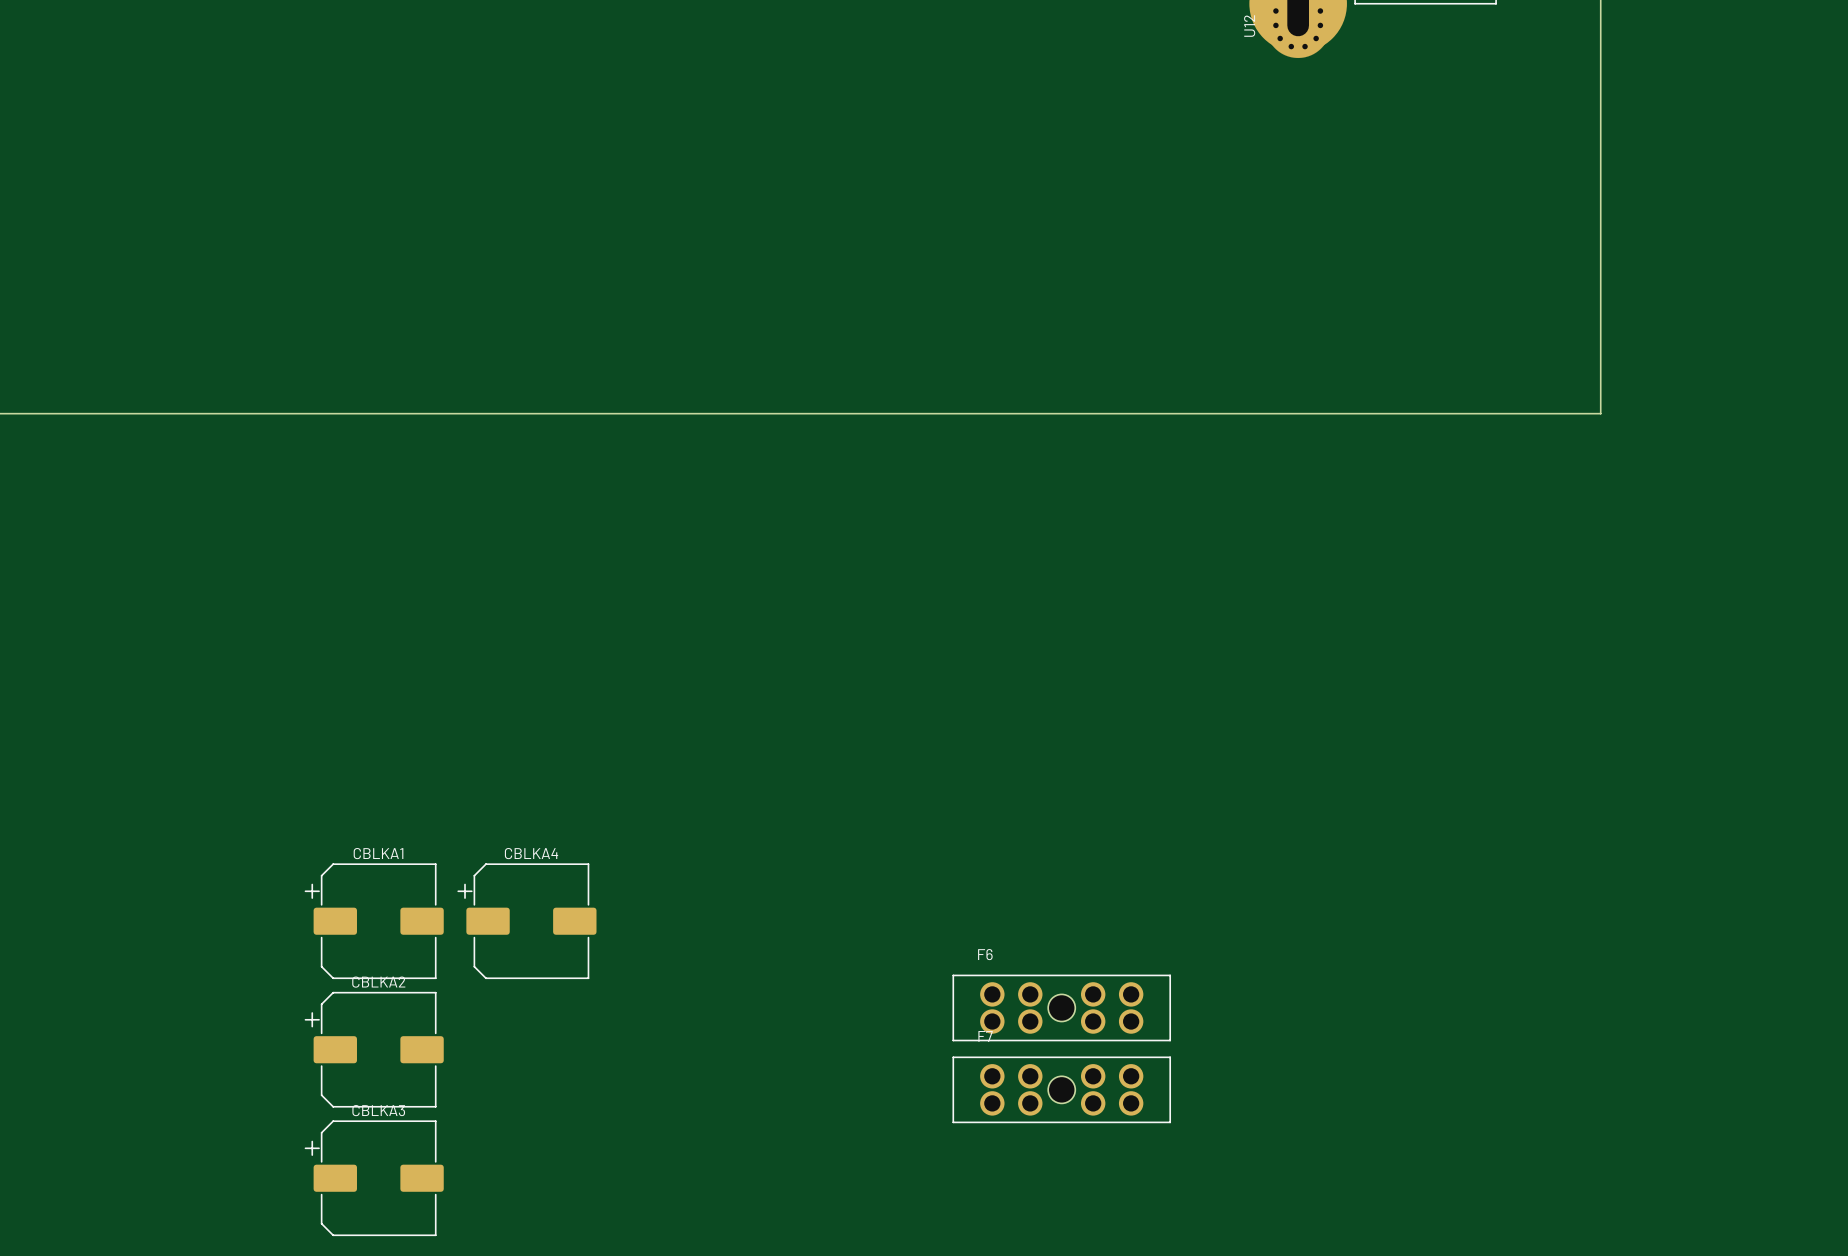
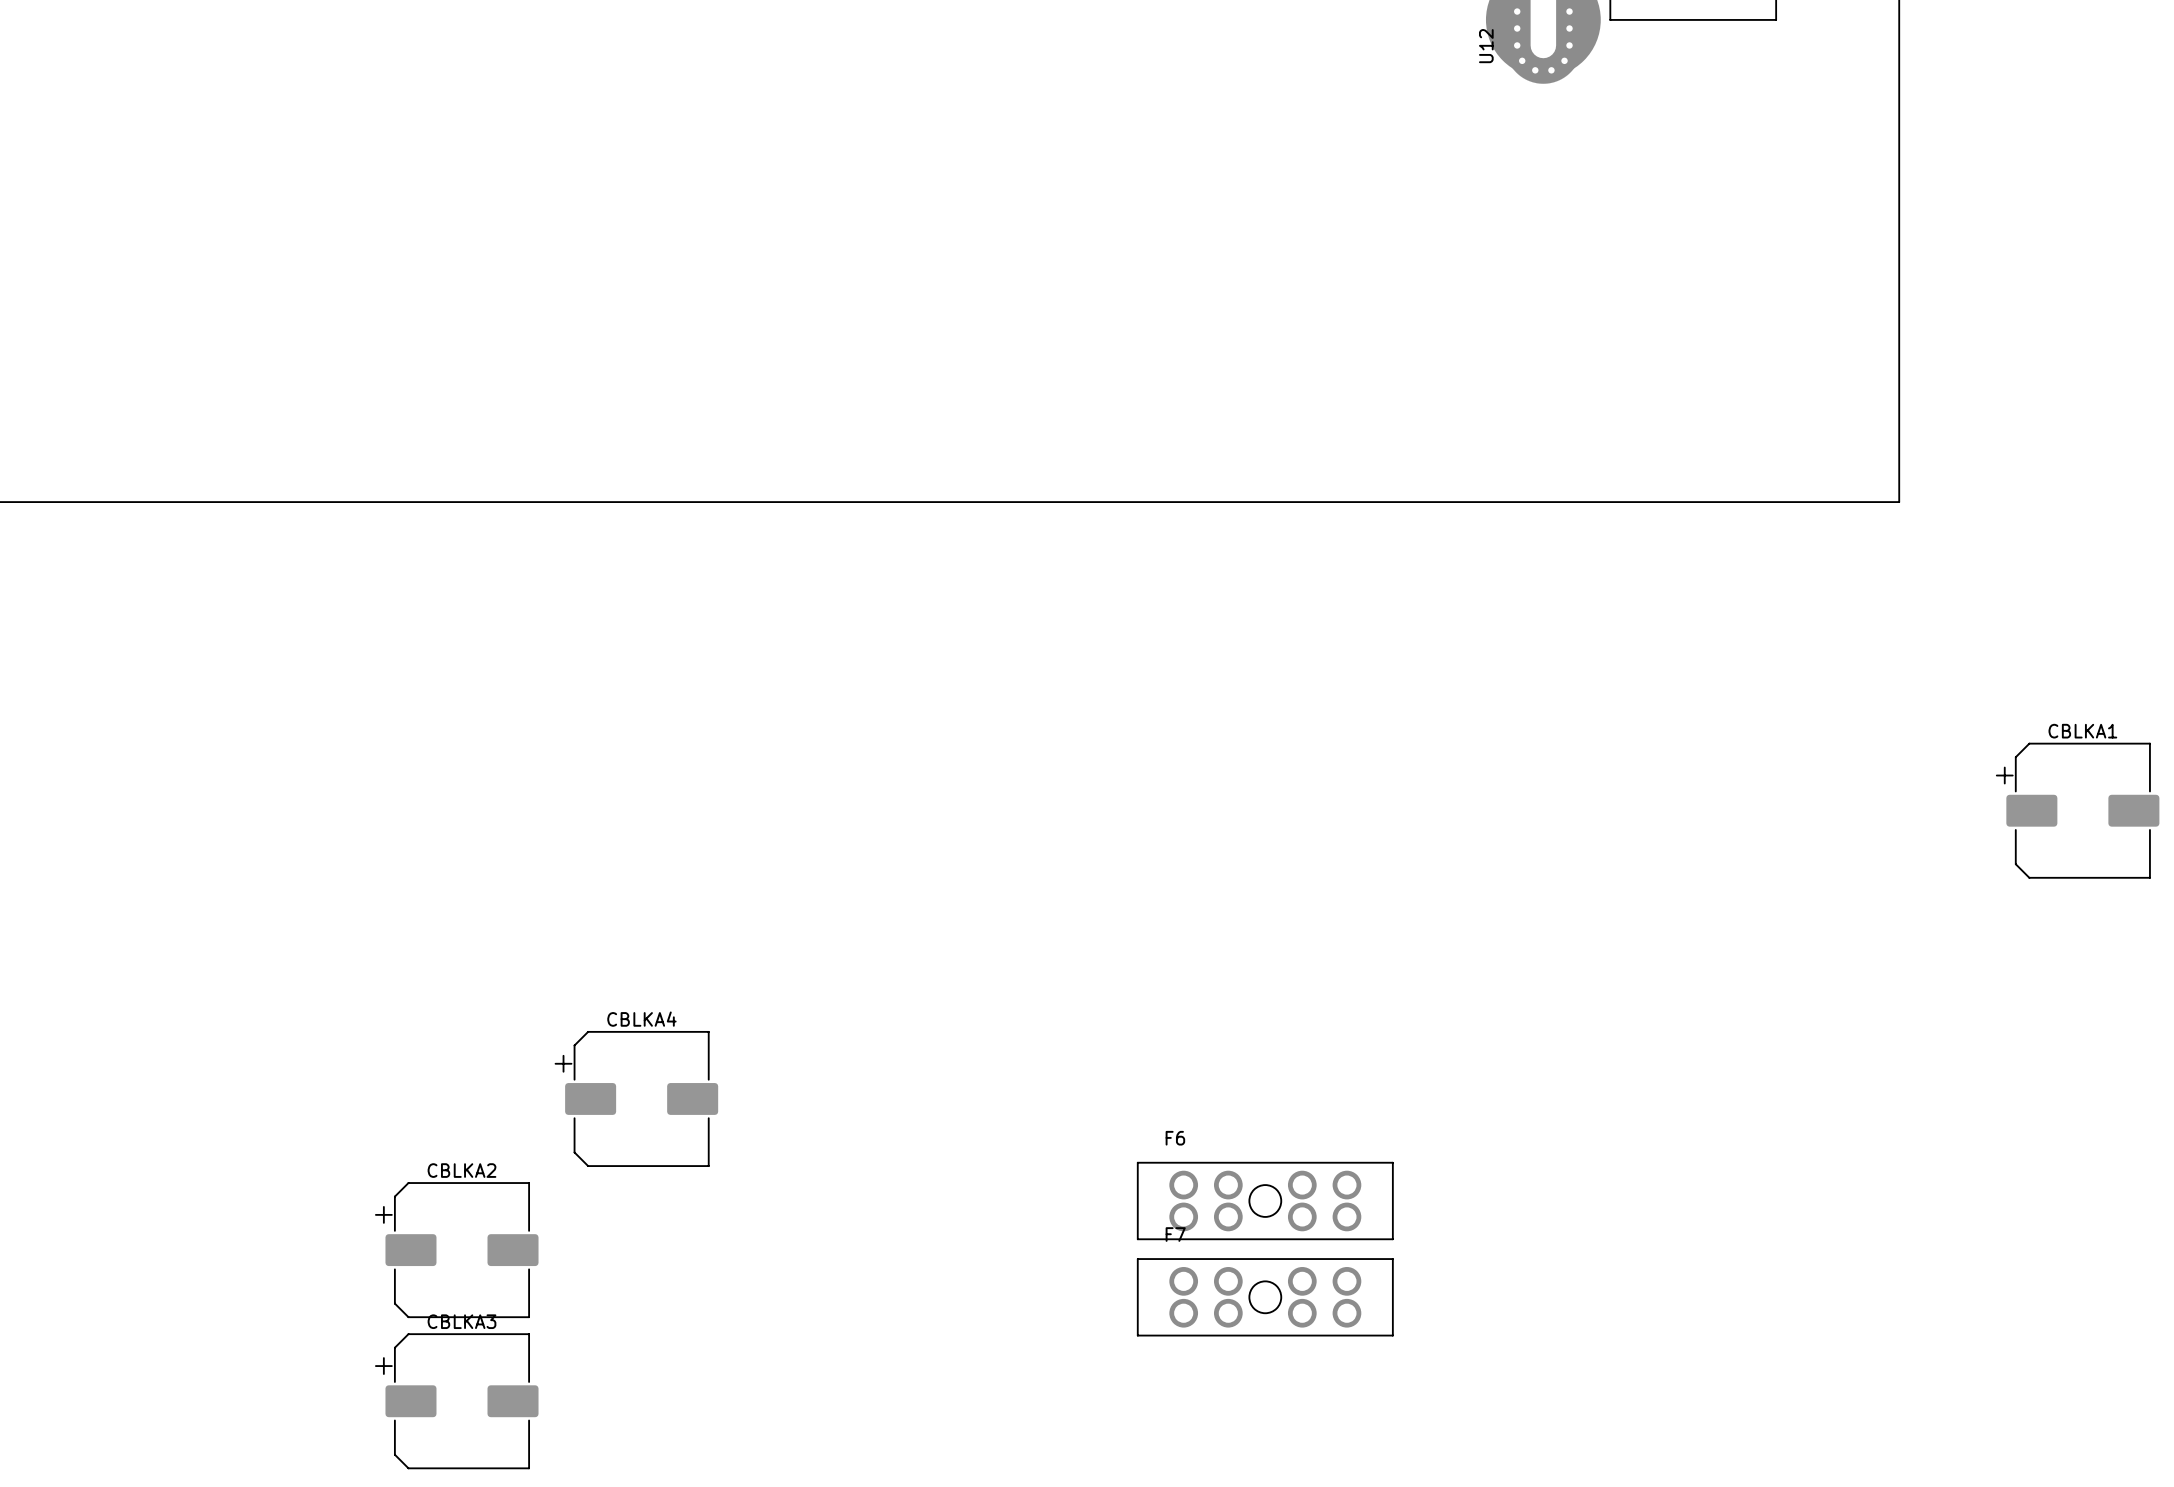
CBLKA1 position: (374, 921) -> (2077, 810)

